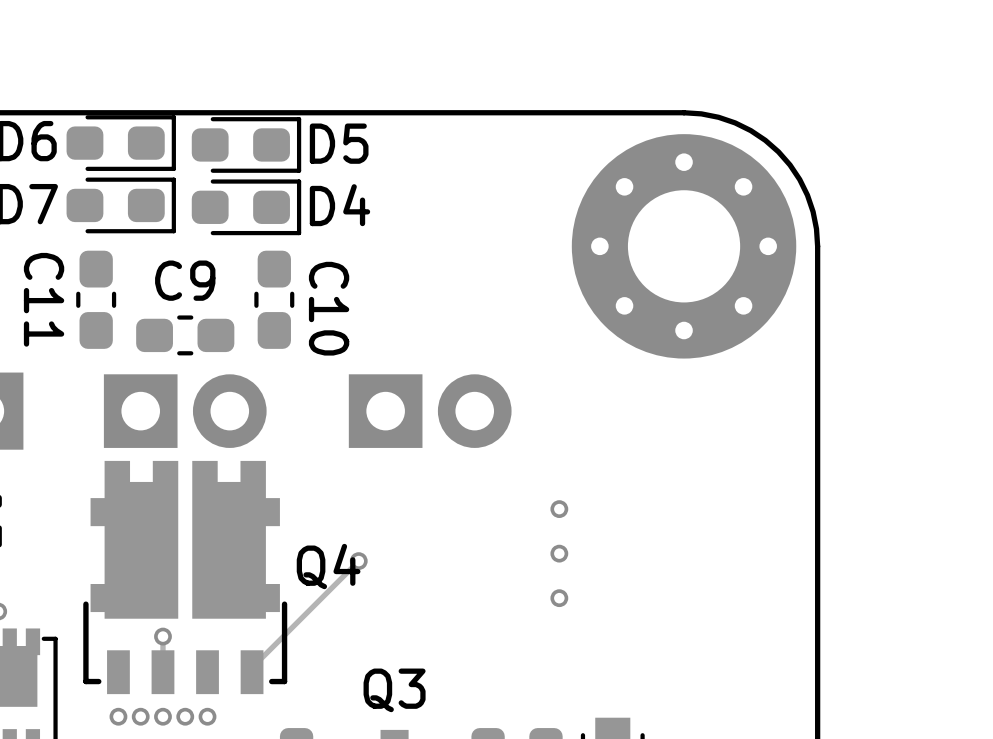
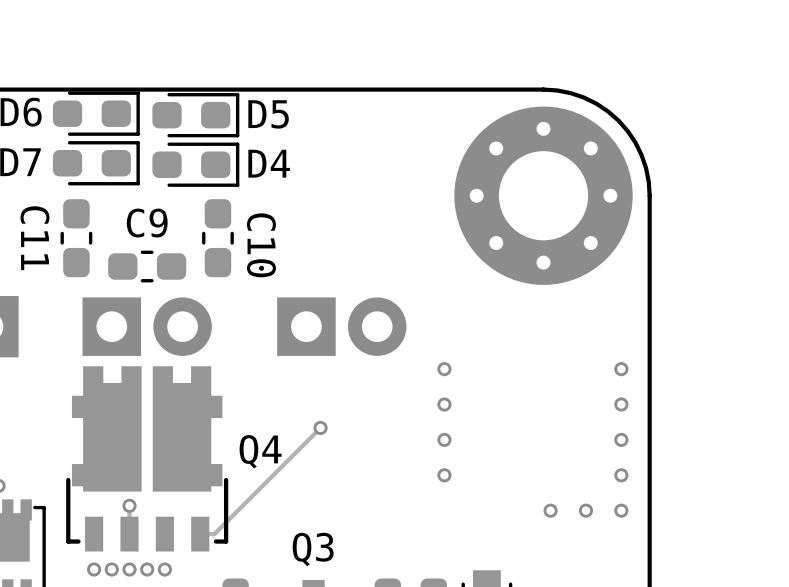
via: none -> (444, 369)
via: none -> (621, 369)
via: none -> (621, 404)
via: none -> (621, 439)
track: (358, 561) (252, 667) (252, 672) -> (320, 427) (214, 534) (200, 534)
via position: (358, 561) -> (320, 427)
via: none -> (621, 475)
via: none -> (550, 510)
via: none -> (585, 510)
via: none -> (621, 510)

